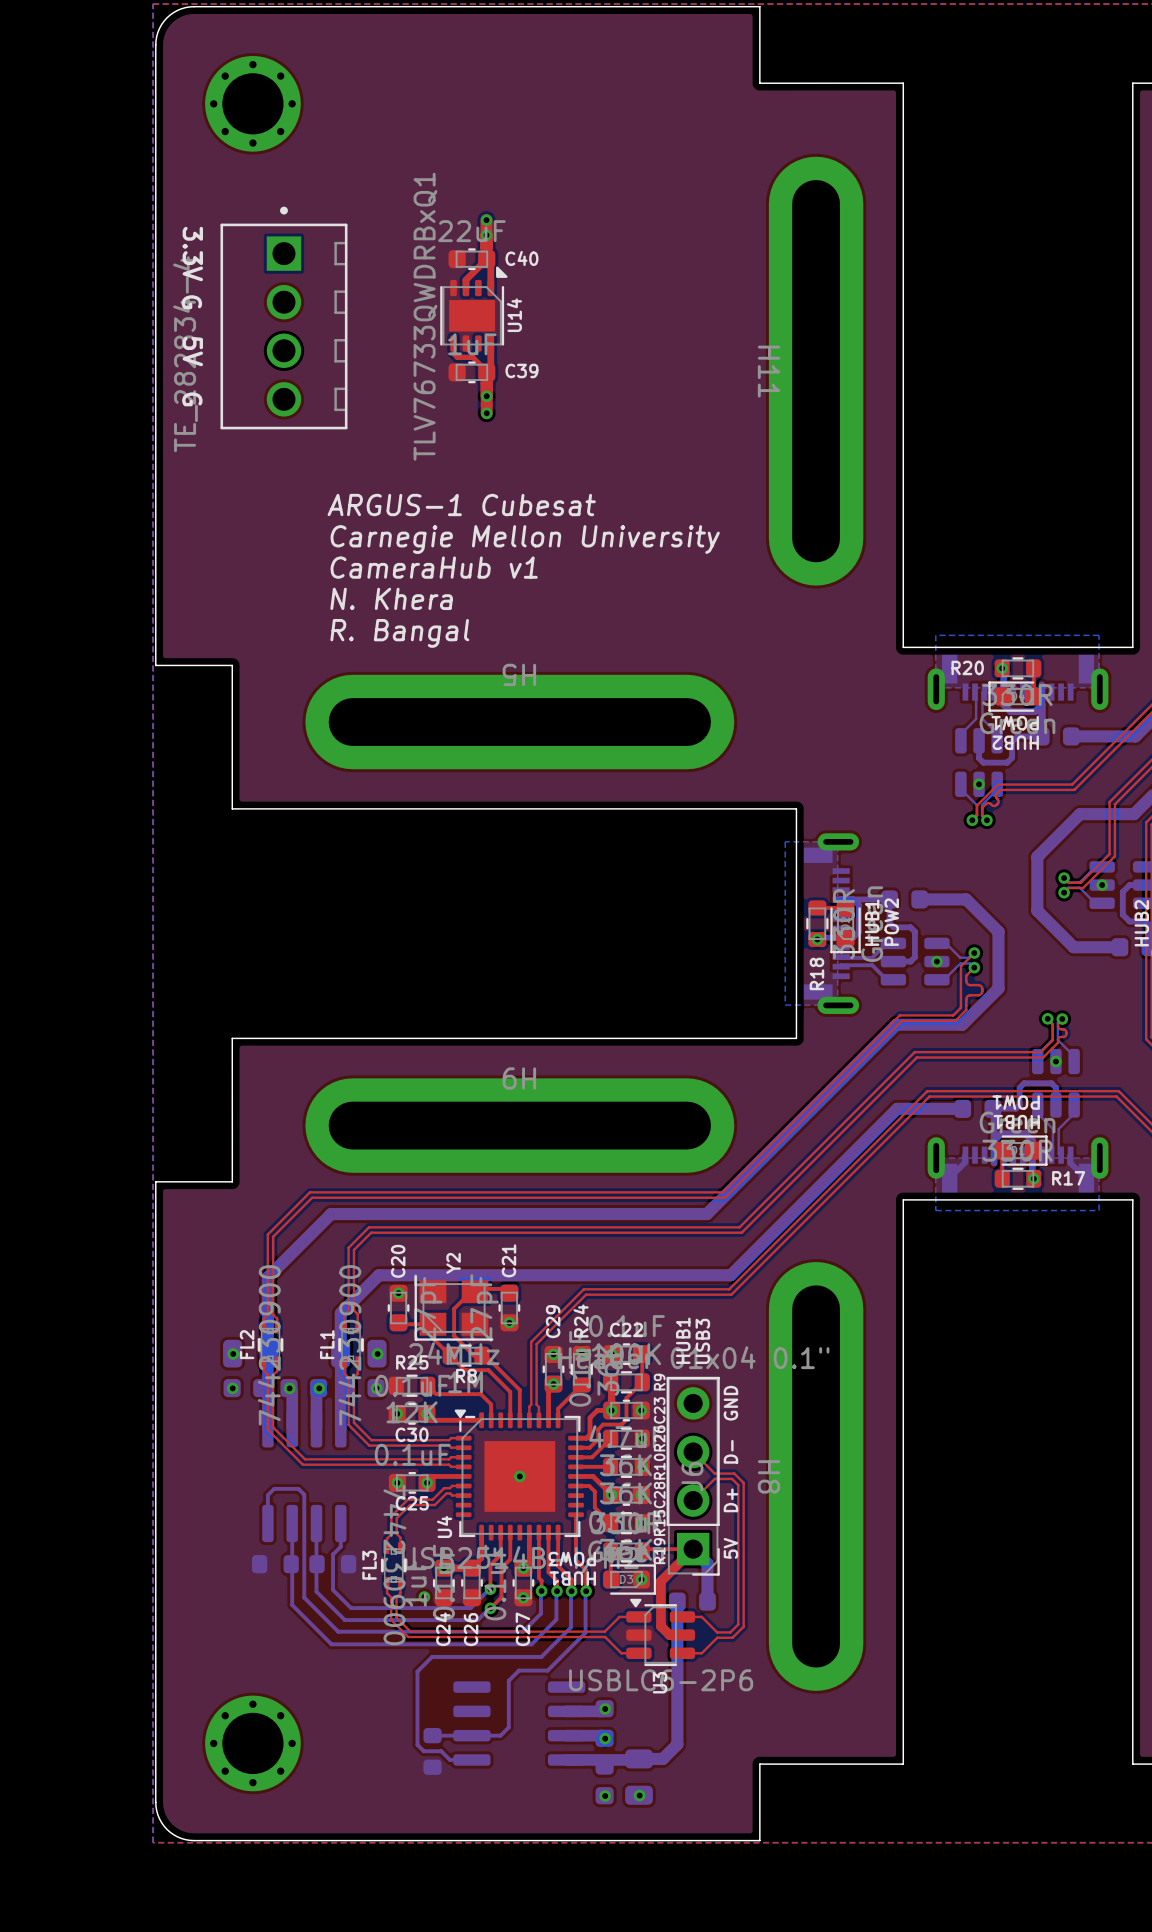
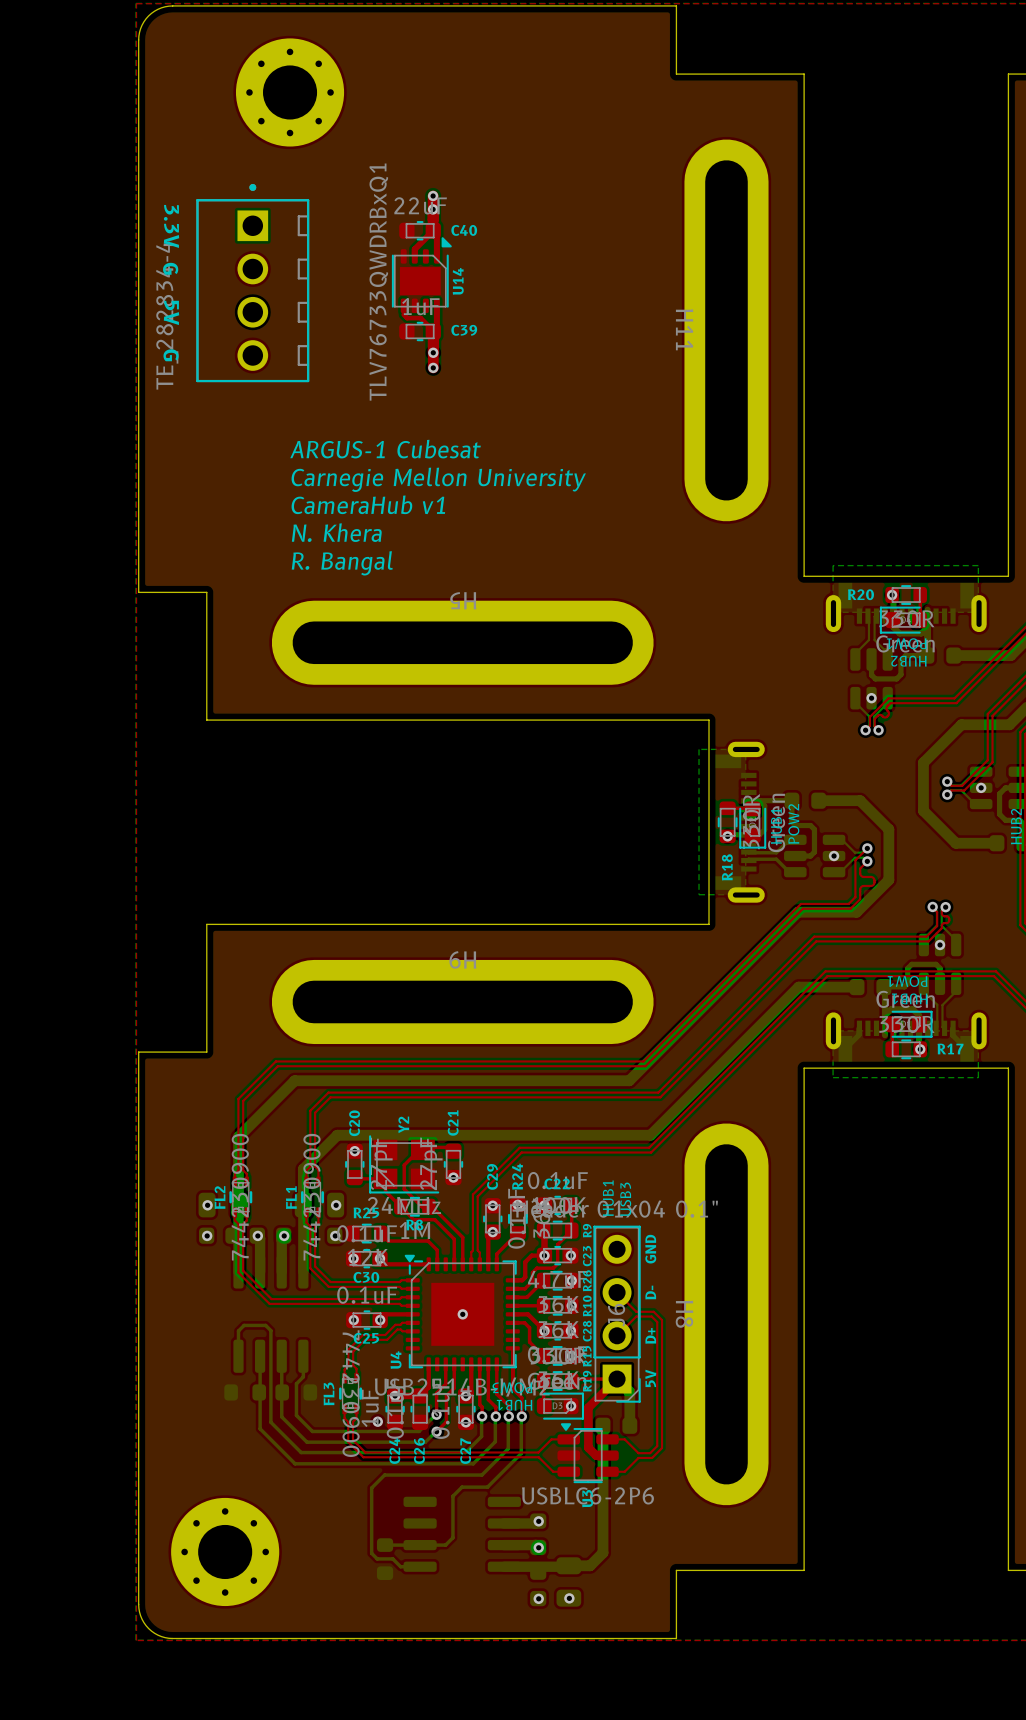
part: (252, 103) -> none
part: none -> (290, 92)
part footprint: [205, 1695, 301, 1792] -> [171, 1497, 280, 1607]

